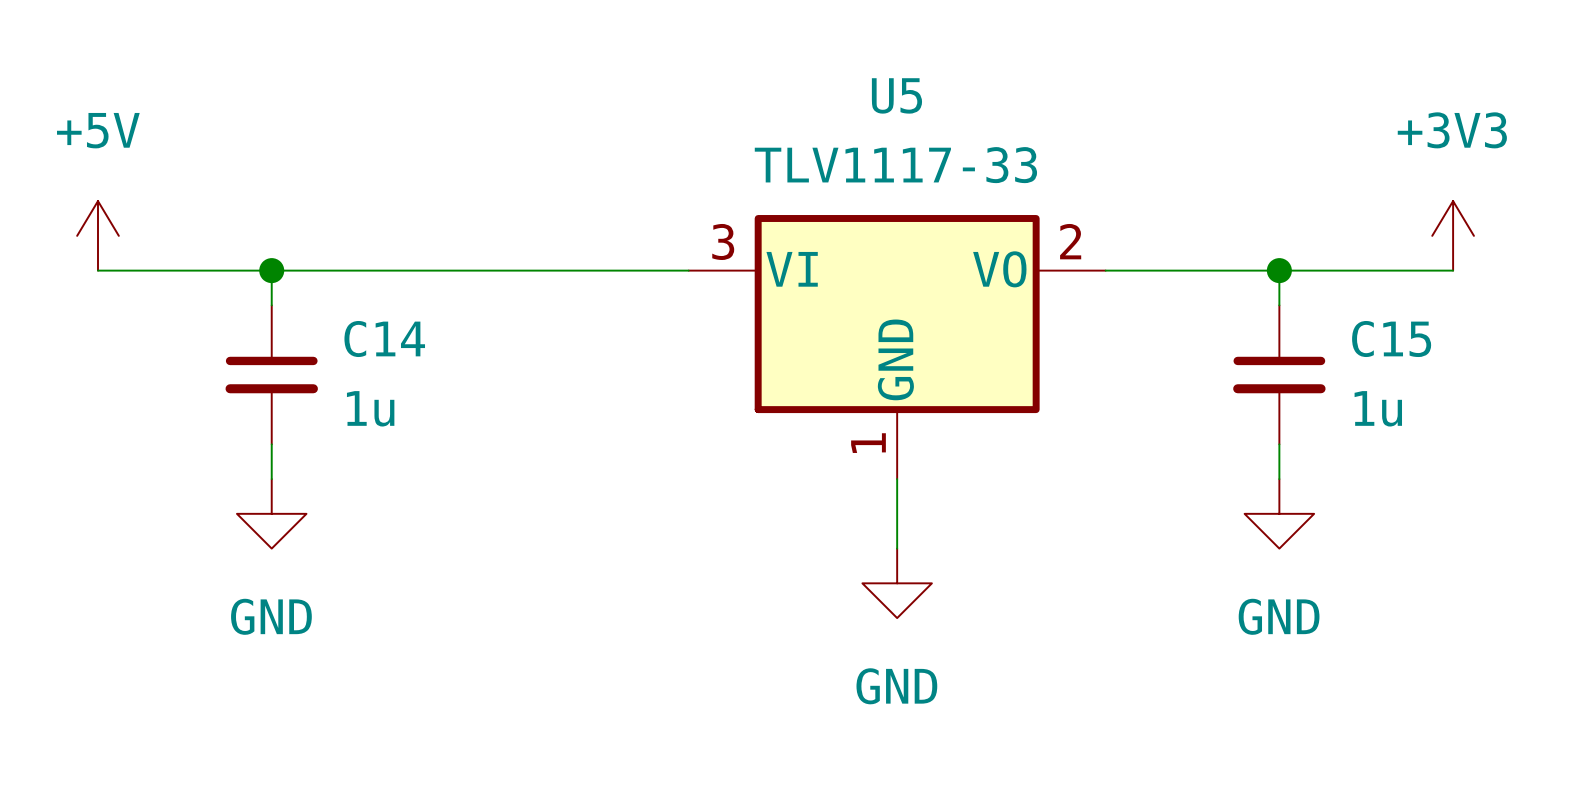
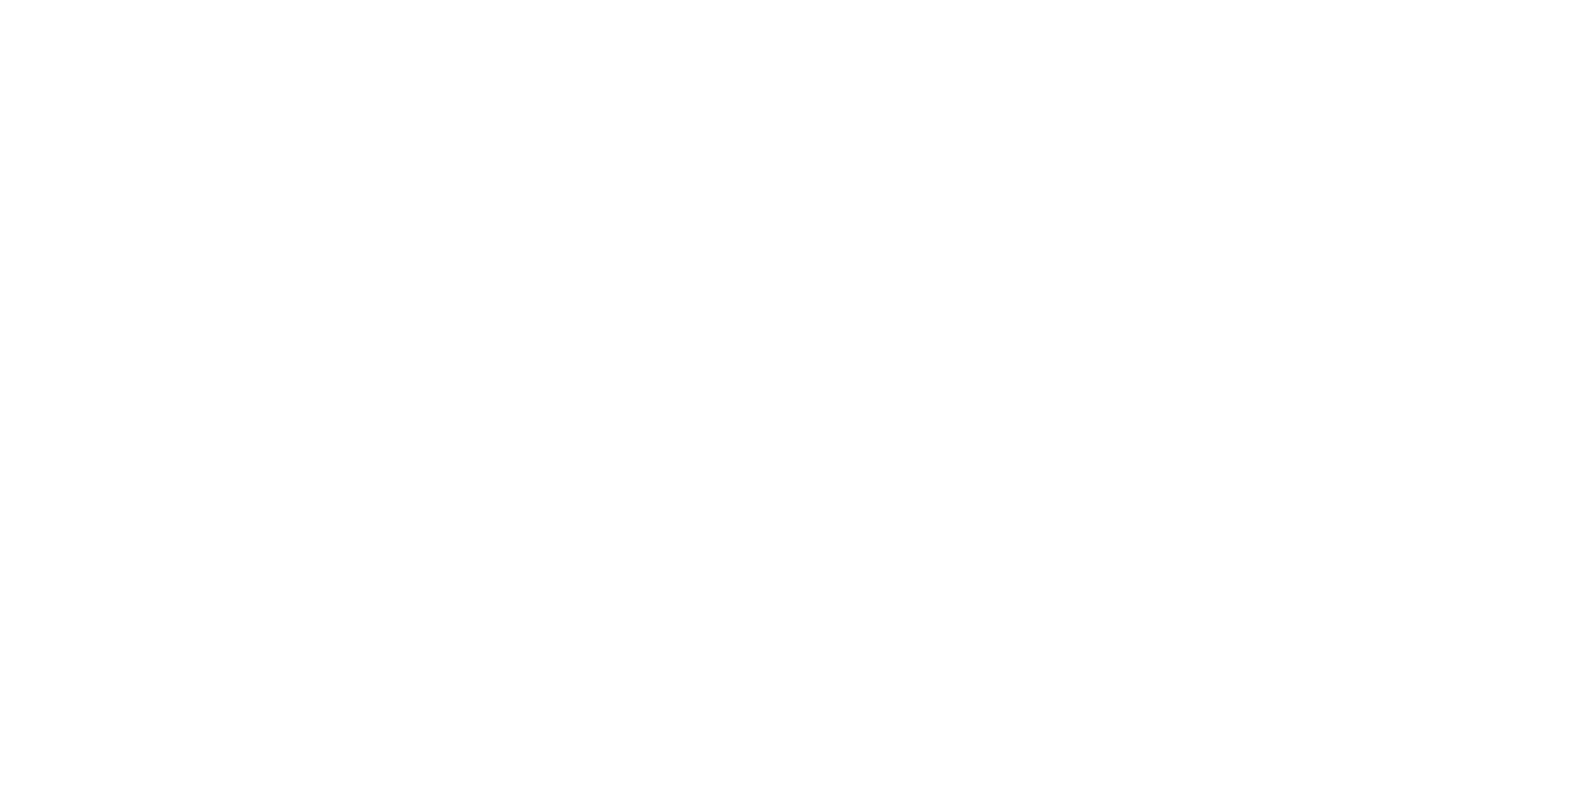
power symbol: +5V (98, 235) -> none
power symbol: +3V3 (1453, 235) -> none
wire: (98, 270) (688, 270) -> none
wire: (271, 270) (271, 305) -> none
junction: (271, 270) -> none
wire: (1105, 270) (1453, 270) -> none
wire: (1279, 270) (1279, 305) -> none
junction: (1279, 270) -> none
U5: TLV1117-33 (897, 347) -> none
C14: 1u (271, 374) -> none
C15: 1u (1279, 374) -> none
wire: (271, 444) (271, 479) -> none
wire: (1279, 444) (1279, 479) -> none
wire: (897, 479) (897, 548) -> none
power symbol: GND (271, 513) -> none
power symbol: GND (1279, 513) -> none
power symbol: GND (897, 583) -> none

